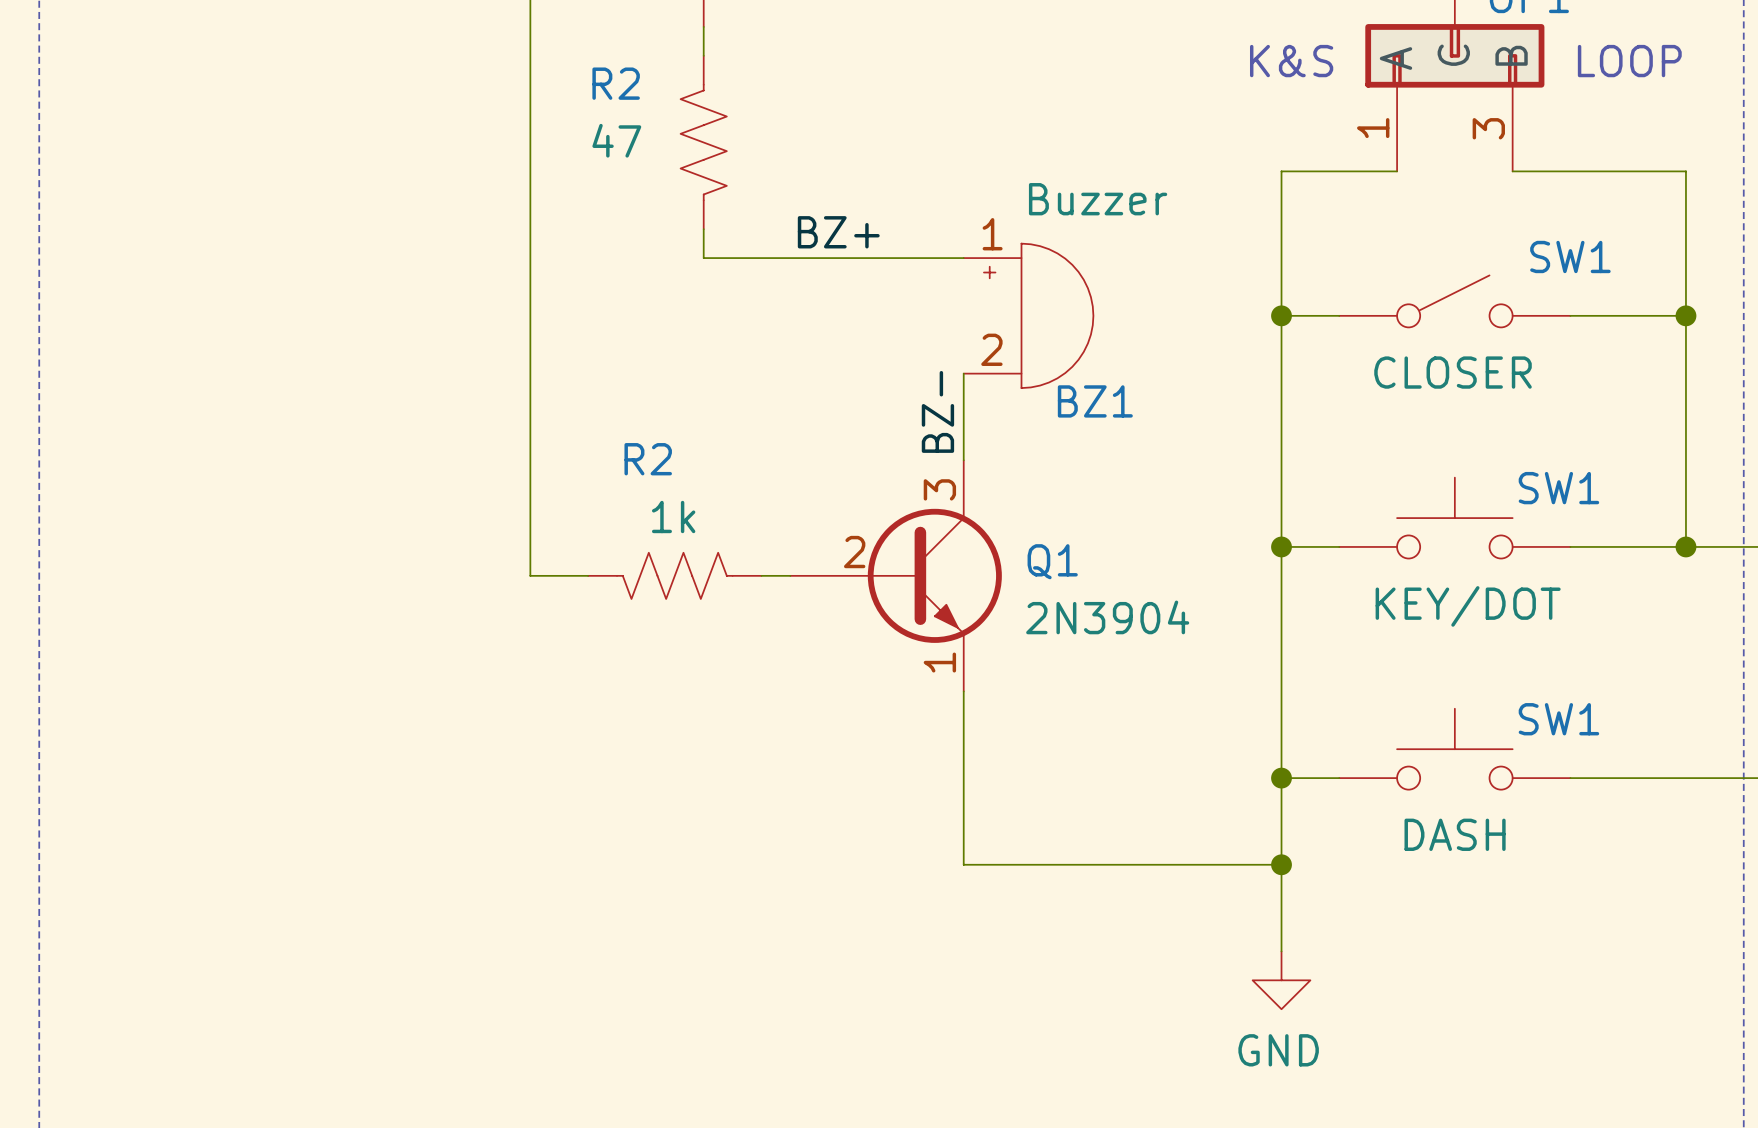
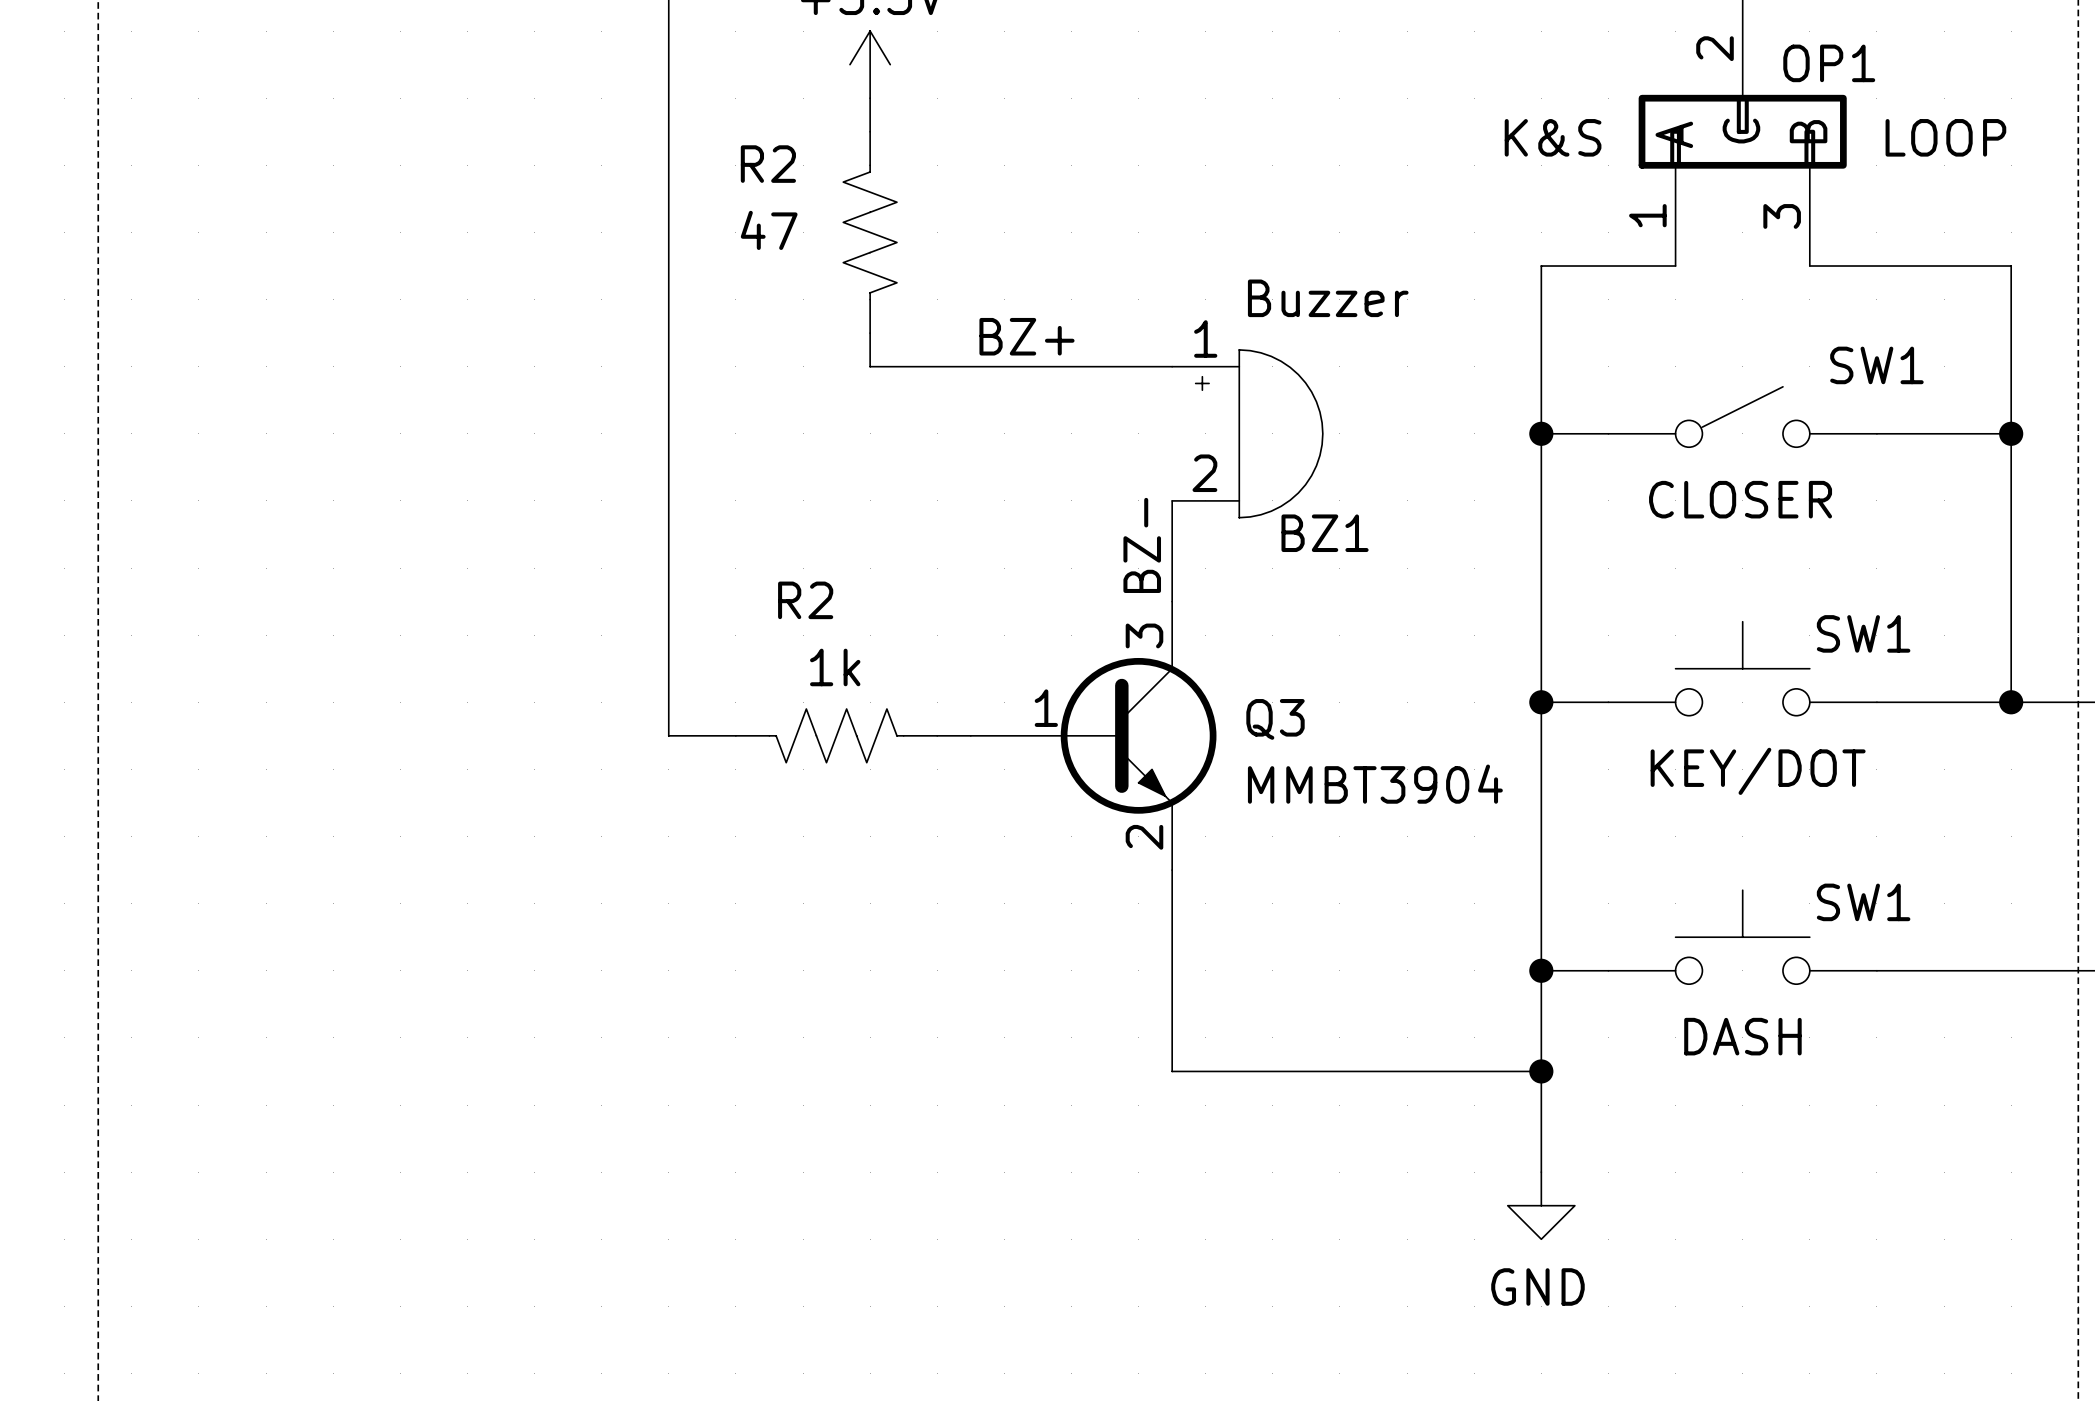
Q1 pin number: 2 (854, 552) -> 1 (1046, 708)
Q1 name: Q1 (1052, 561) -> Q3 (1275, 719)
Q1 value: 2N3904 (1107, 617) -> MMBT3904 (1375, 784)
Q1 pin number: 1 (939, 662) -> 2 (1144, 837)

